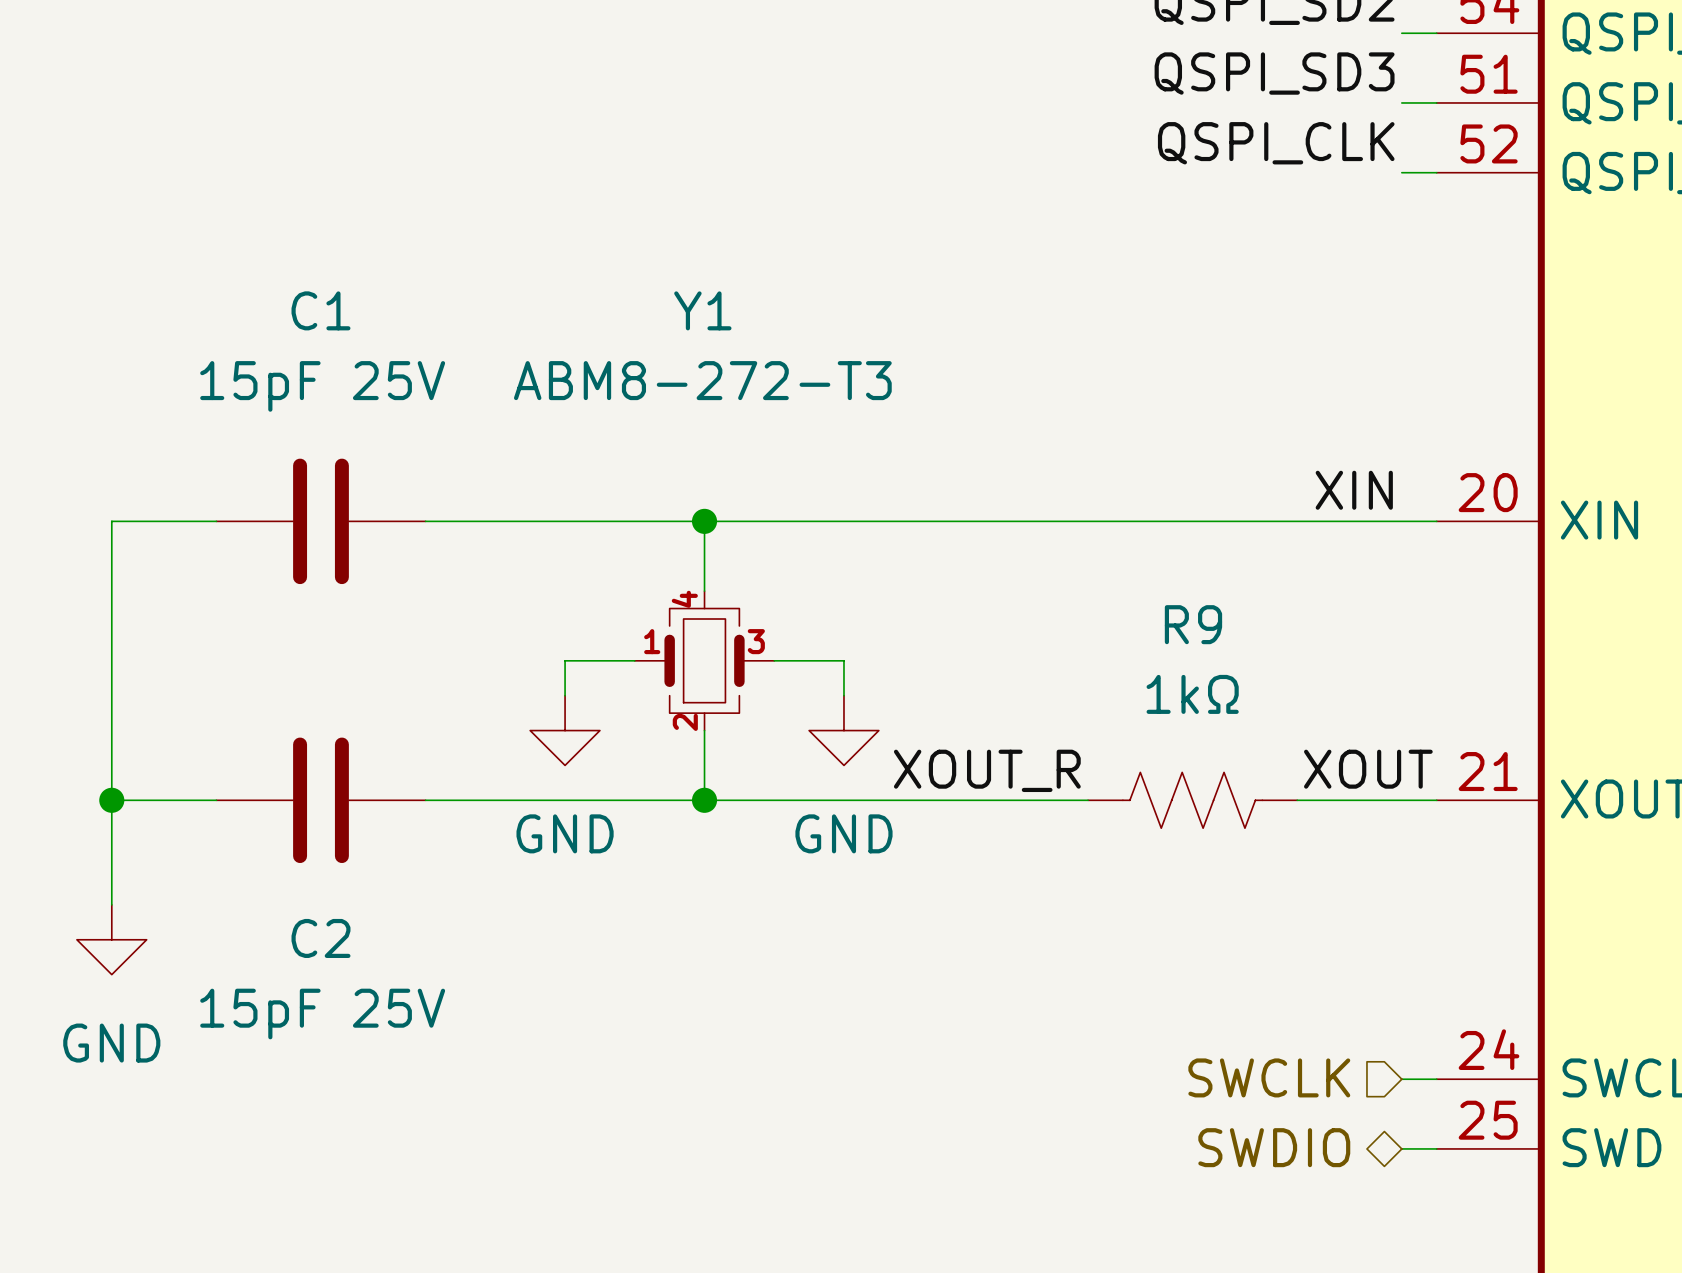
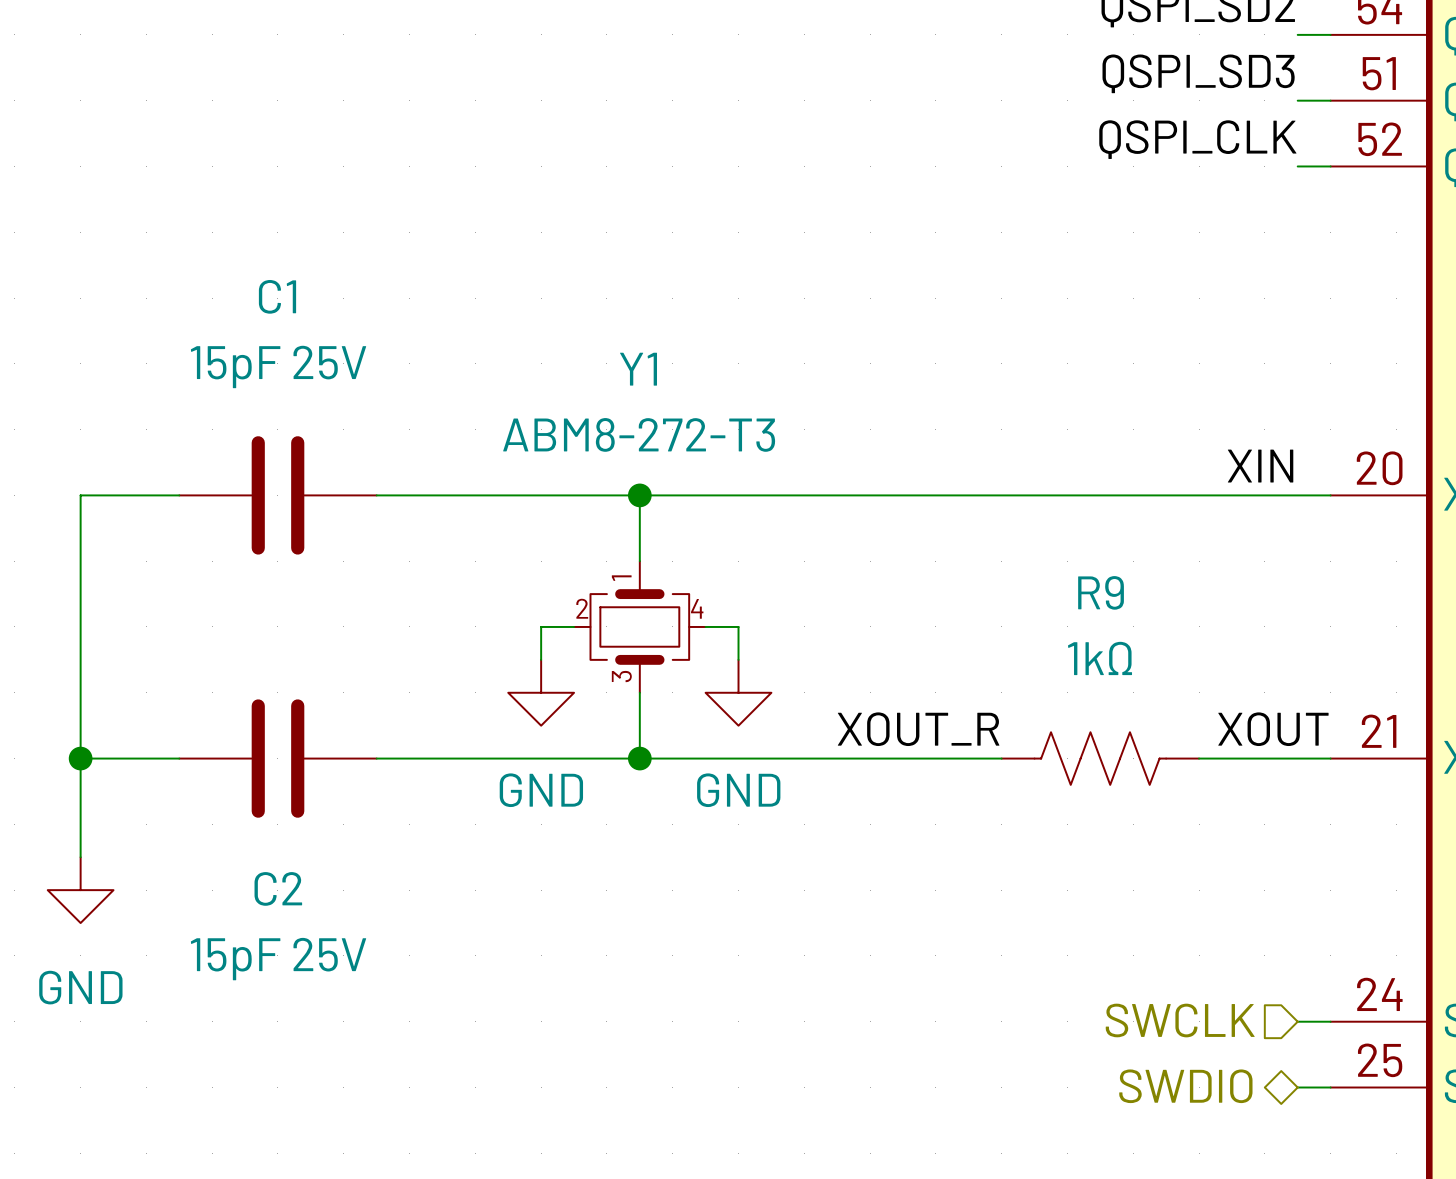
Y1 name position: Y1 (702, 310) -> Y1 (638, 369)
Y1 value position: ABM8-272-T3 (702, 380) -> ABM8-272-T3 (639, 434)
wire: (599, 660) (565, 660) (565, 695) -> (541, 626) (541, 659)
Y1 rotation: 0° (704, 660) -> 90° clockwise (639, 626)
wire: (809, 660) (843, 660) (843, 695) -> (738, 626) (738, 659)
power symbol position: GND (565, 730) -> GND (541, 692)
power symbol position: GND (843, 730) -> GND (738, 692)

